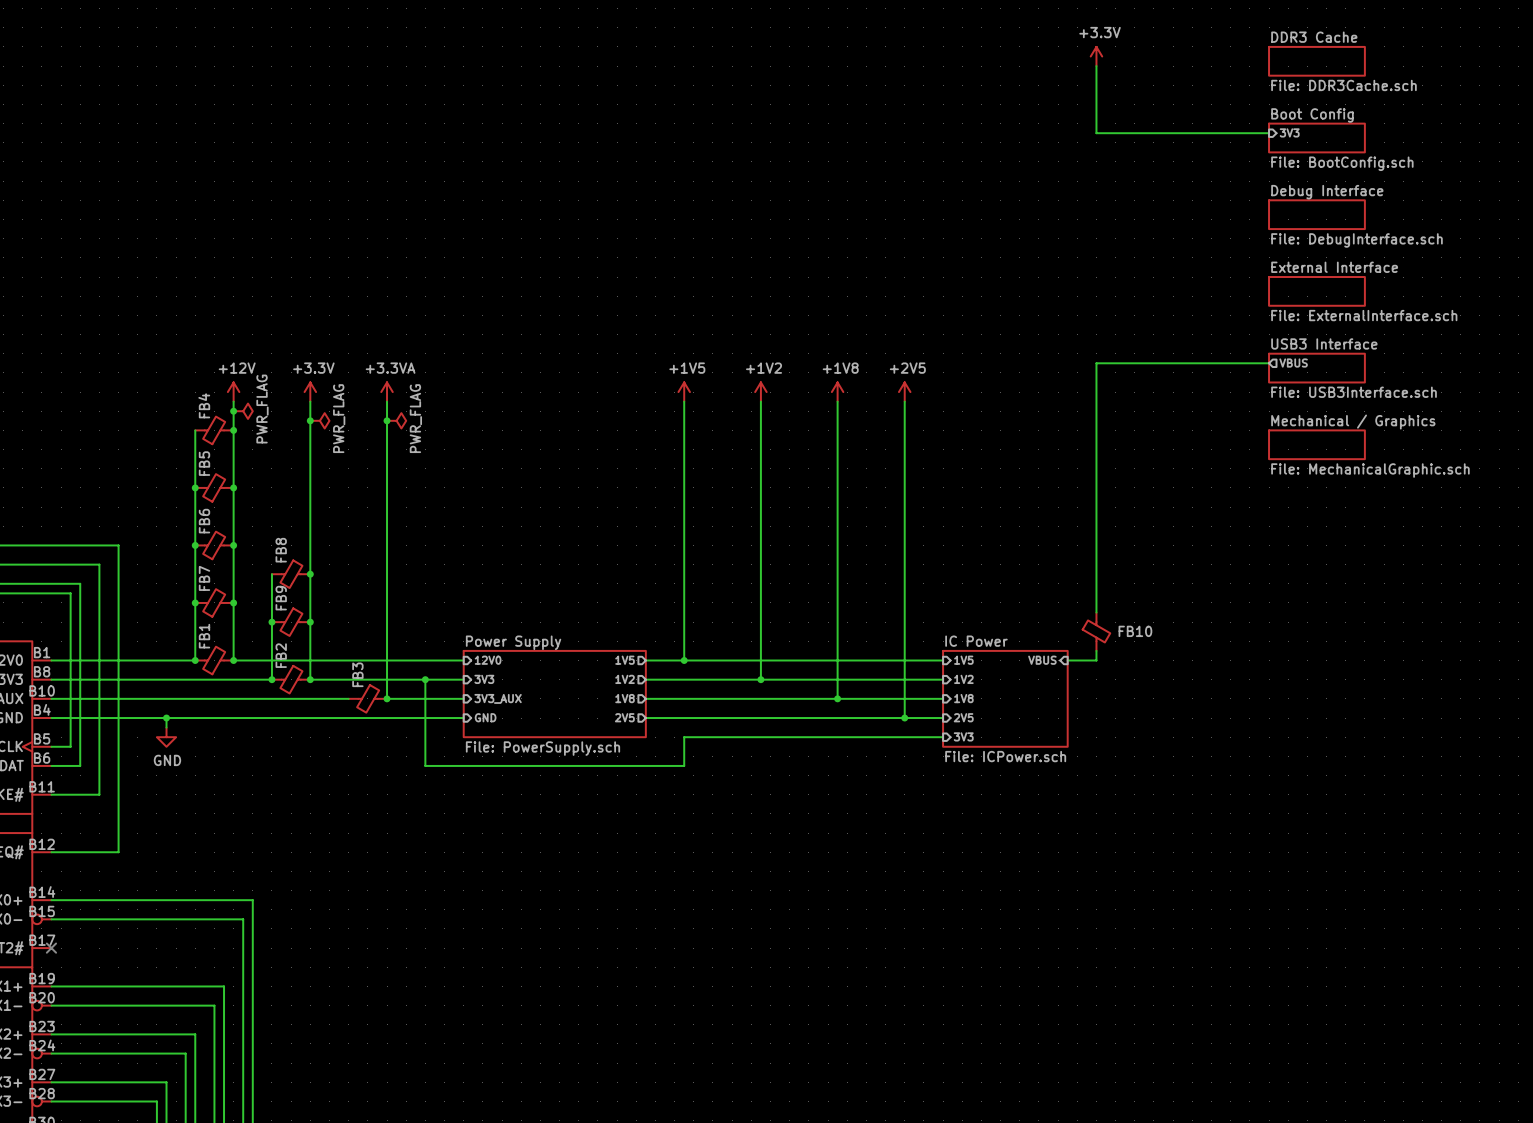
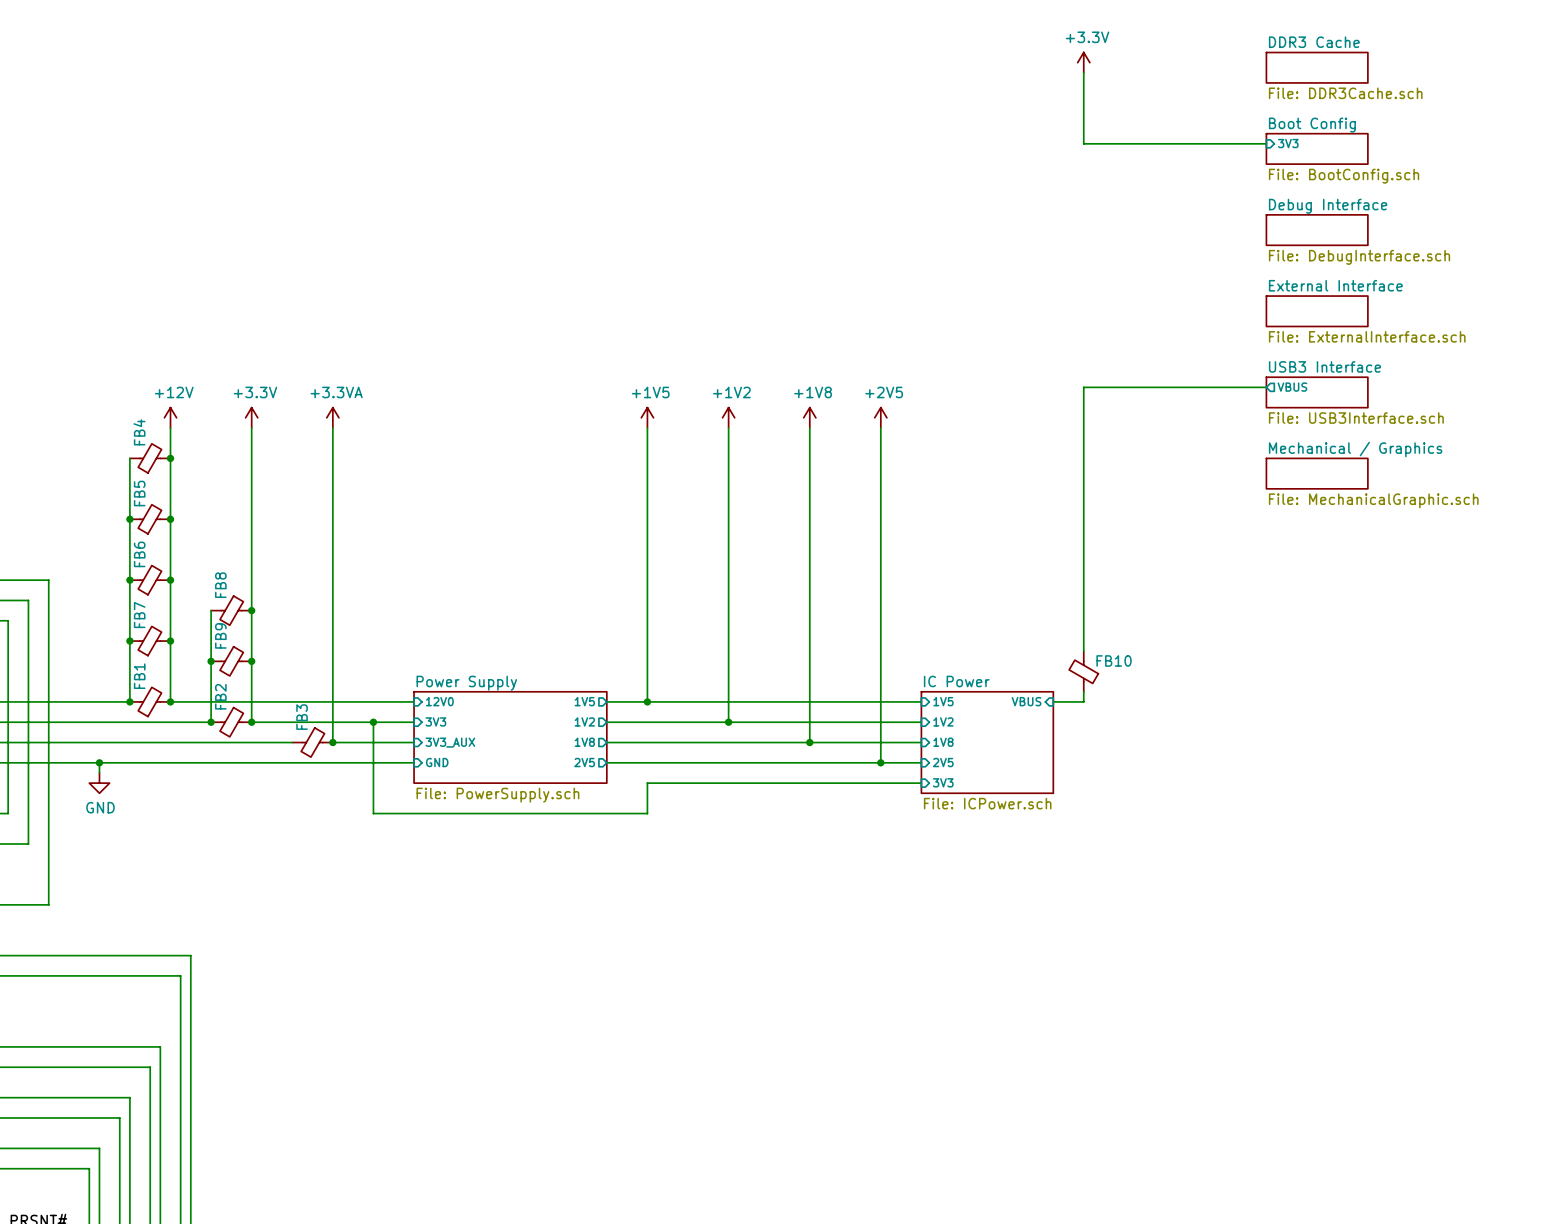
junction: (233, 411) -> none
power symbol: PWR_FLAG (243, 411) -> none
junction: (310, 420) -> none
power symbol: PWR_FLAG (319, 420) -> none
junction: (387, 420) -> none
power symbol: PWR_FLAG (396, 420) -> none
FB10 rotation: 0° (1096, 631) -> 180° (1083, 671)

